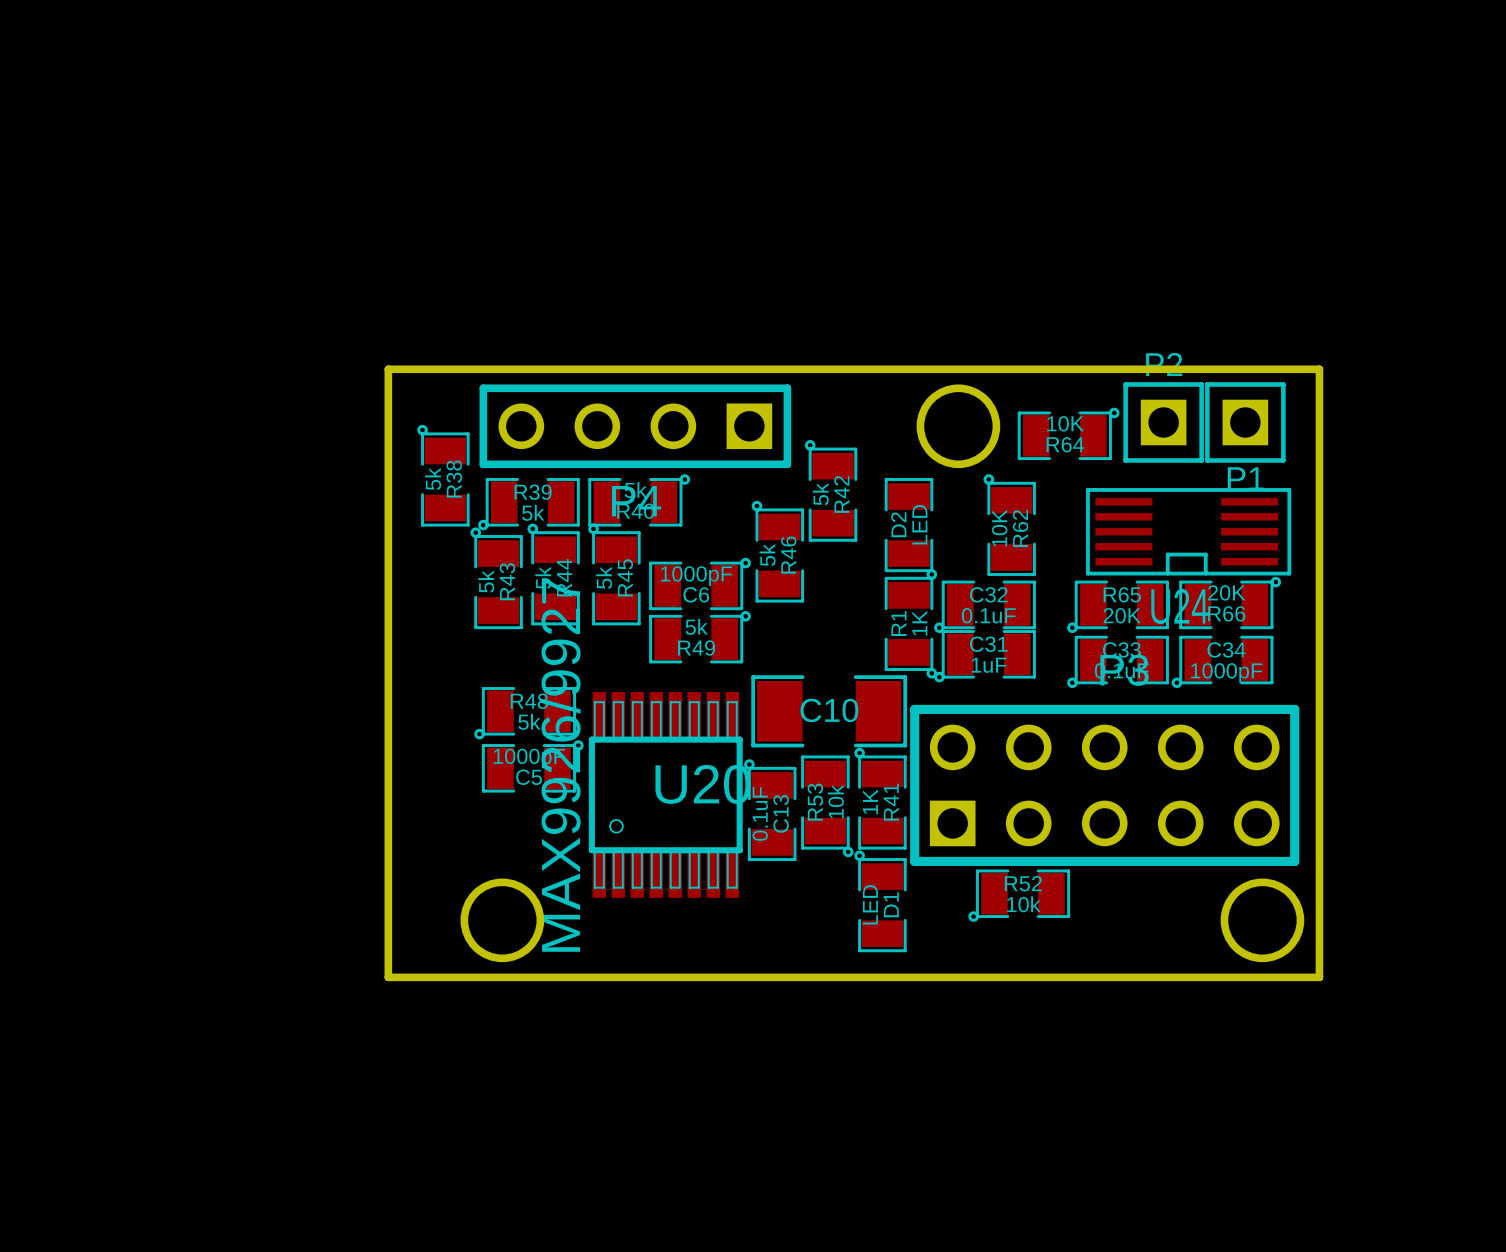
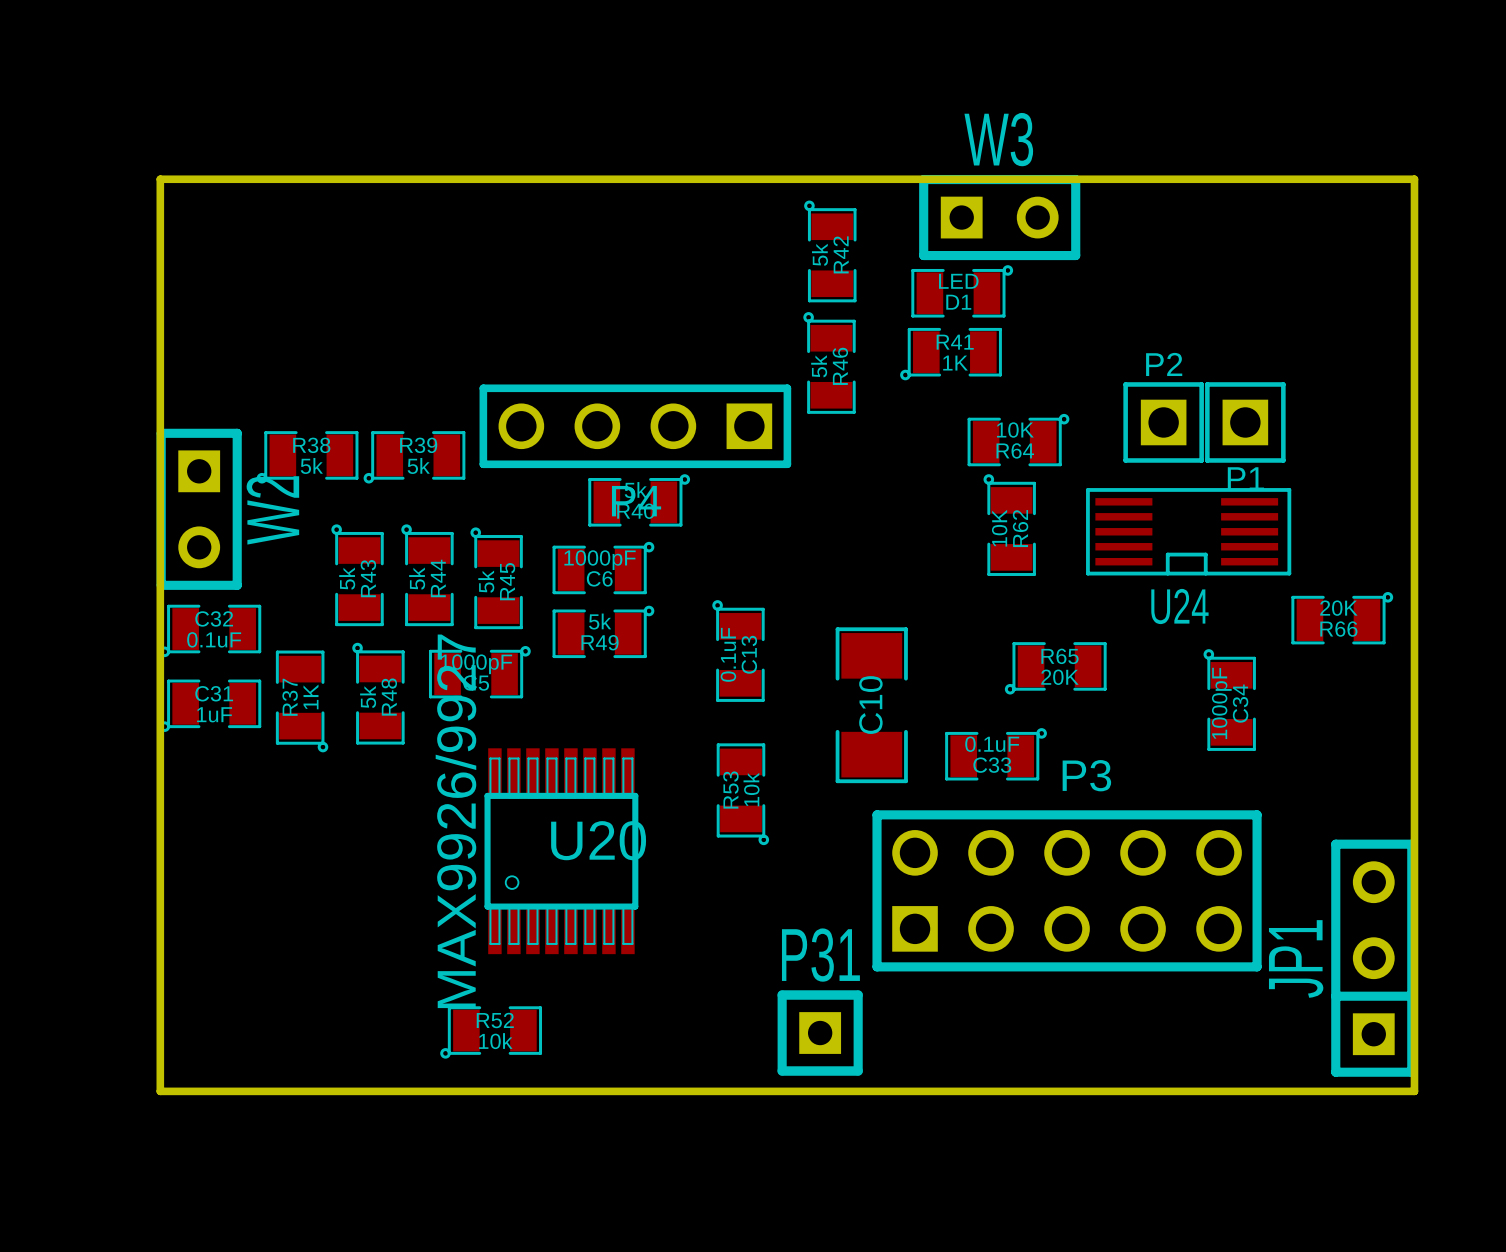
board edge: none -> (160, 179) (160, 1091) (1414, 1091) (1414, 179) (160, 179)
W3: none -> (999, 217)
board edge: (388, 369) (1319, 369) (1319, 977) (388, 977) (388, 369) -> none
round board edge: [916, 384, 1001, 469] -> none
R64 position: (1068, 433) -> (1018, 440)
R38 rotation: 0° (443, 475) -> 90° counterclockwise (307, 457)
R38 position: (443, 475) -> (307, 457)
R42 position: (831, 490) -> (830, 251)
R39 position: (528, 504) -> (414, 457)
W2: none -> (199, 509)
D2: LED (910, 528) -> none
R46 position: (777, 551) -> (829, 362)
R44 position: (553, 574) -> (427, 575)
R45: 5k (614, 574) -> none
R43: none -> 5k (357, 575)
R43 name: R43 (507, 581) -> R45 (507, 581)
C6 position: (699, 584) -> (603, 568)
R66 position: (1230, 603) -> (1342, 618)
C32 position: (985, 606) -> (210, 630)
R65 position: (1118, 606) -> (1055, 668)
R1: 1K (910, 627) -> none
R49 position: (699, 637) -> (603, 631)
C31 position: (985, 656) -> (210, 705)
C33 rotation: 0° (1118, 661) -> 180° (996, 754)
C33 position: (1118, 661) -> (996, 754)
C34 rotation: 0° (1222, 661) -> 90° clockwise (1229, 700)
R37: none -> 1K (302, 701)
C10 rotation: 0° (829, 711) -> 90° clockwise (871, 705)
R48 rotation: 0° (525, 713) -> 90° clockwise (378, 693)
R48 position: (525, 713) -> (378, 693)
C5 position: (532, 766) -> (479, 672)
P3 position: (1104, 785) -> (1067, 890)
U20 position: (665, 794) -> (561, 851)
R41 rotation: 0° (880, 798) -> 90° counterclockwise (951, 354)
R41 position: (880, 798) -> (951, 354)
R53 position: (827, 806) -> (742, 794)
C13 position: (770, 810) -> (738, 651)
round board edge: [460, 878, 545, 963] -> none
round board edge: [1220, 878, 1305, 963] -> none
R52 position: (1019, 895) -> (491, 1032)
D1 rotation: 0° (880, 901) -> 90° clockwise (962, 291)
D1 position: (880, 901) -> (962, 291)
JP1: none -> (1373, 958)
P31: none -> (820, 1033)

